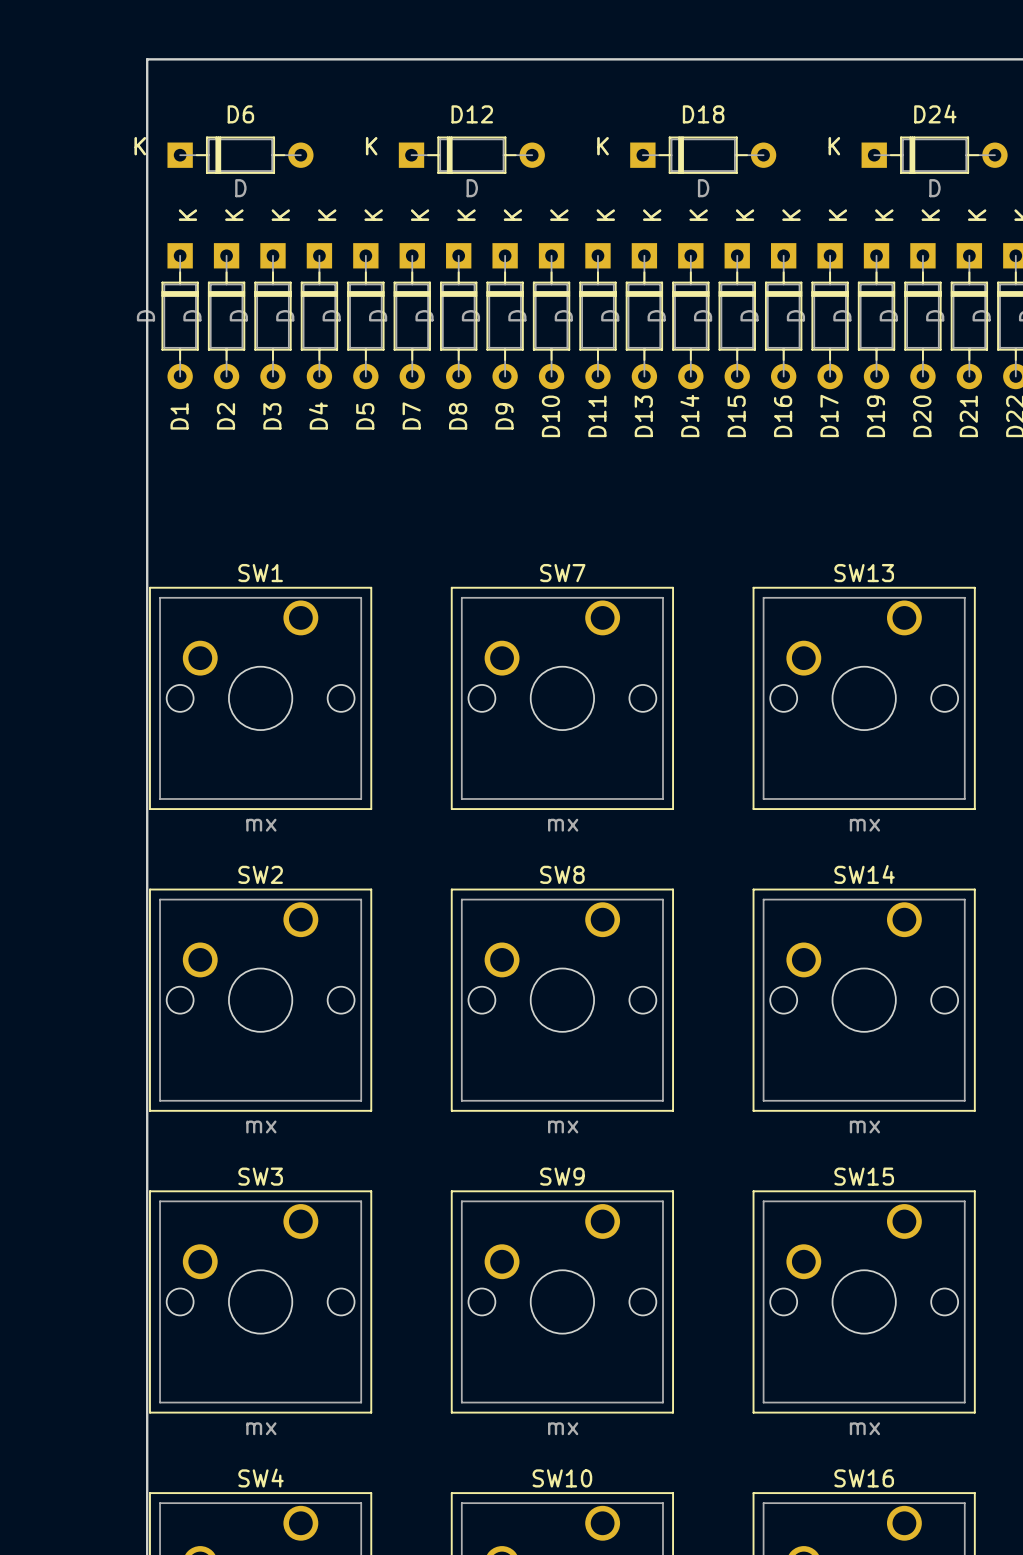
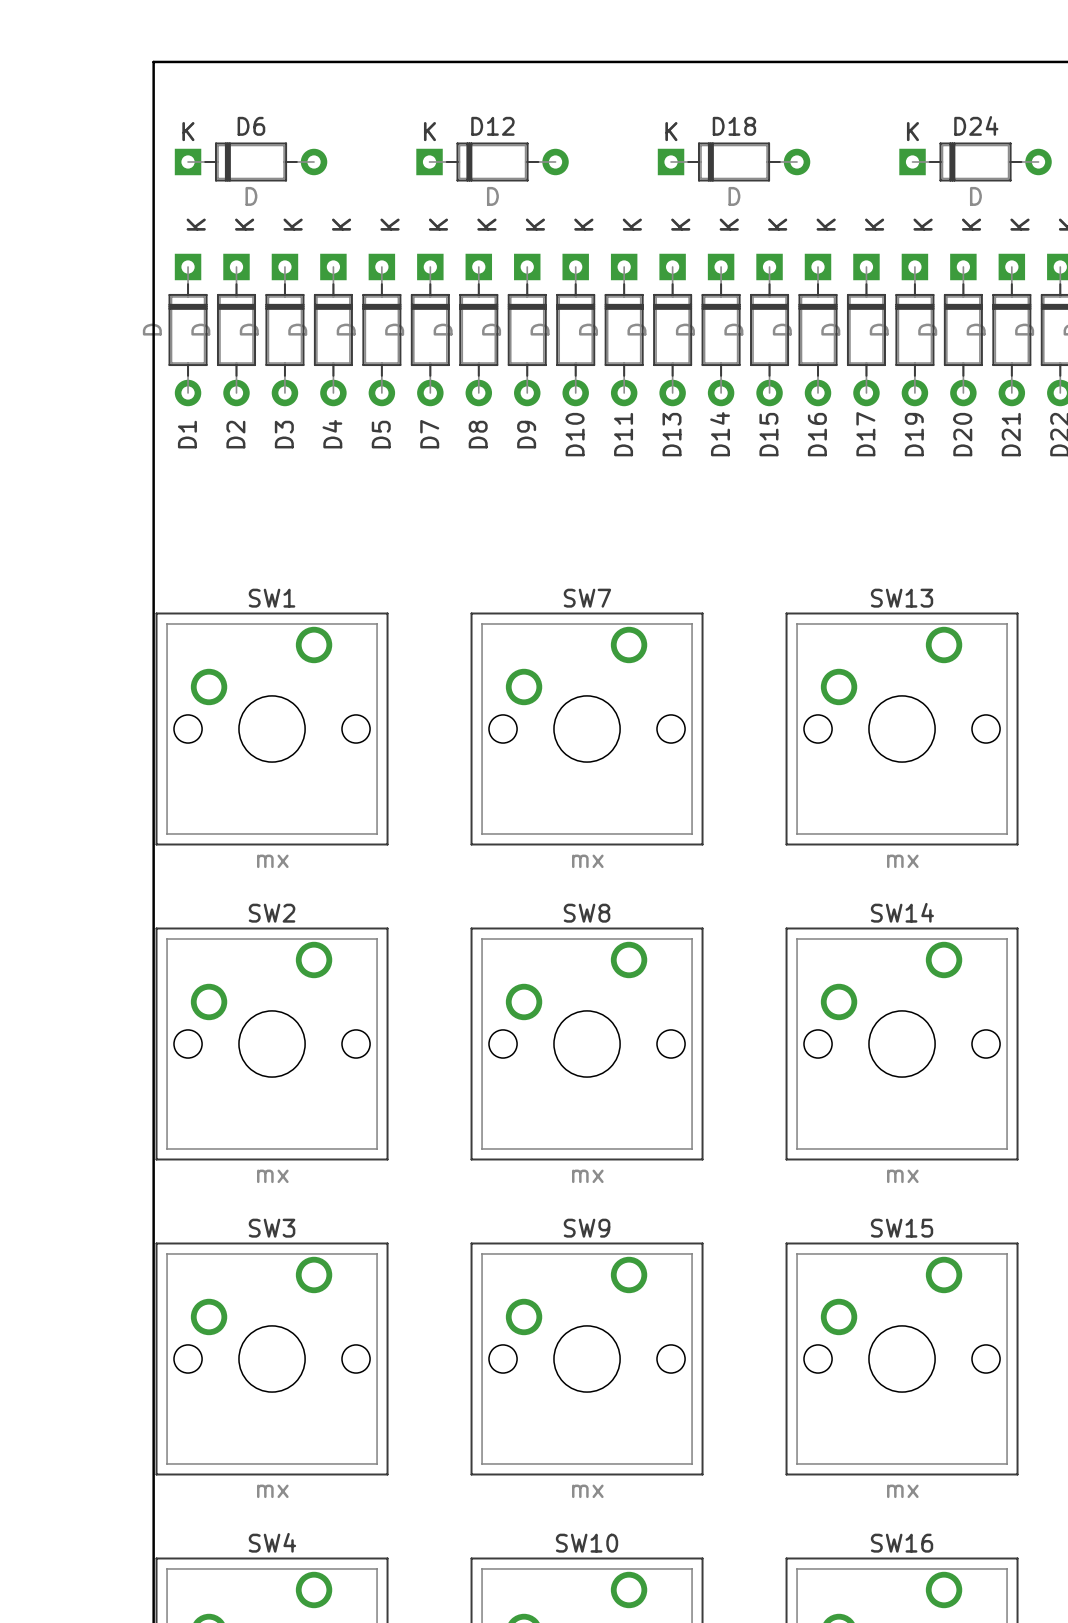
D6 footprint: [167, 136, 314, 174] -> [174, 142, 328, 182]
D12 footprint: [398, 136, 545, 174] -> [416, 142, 569, 182]
D18 footprint: [630, 136, 777, 174] -> [657, 142, 811, 182]
D24 footprint: [861, 136, 1008, 174] -> [899, 142, 1052, 182]

